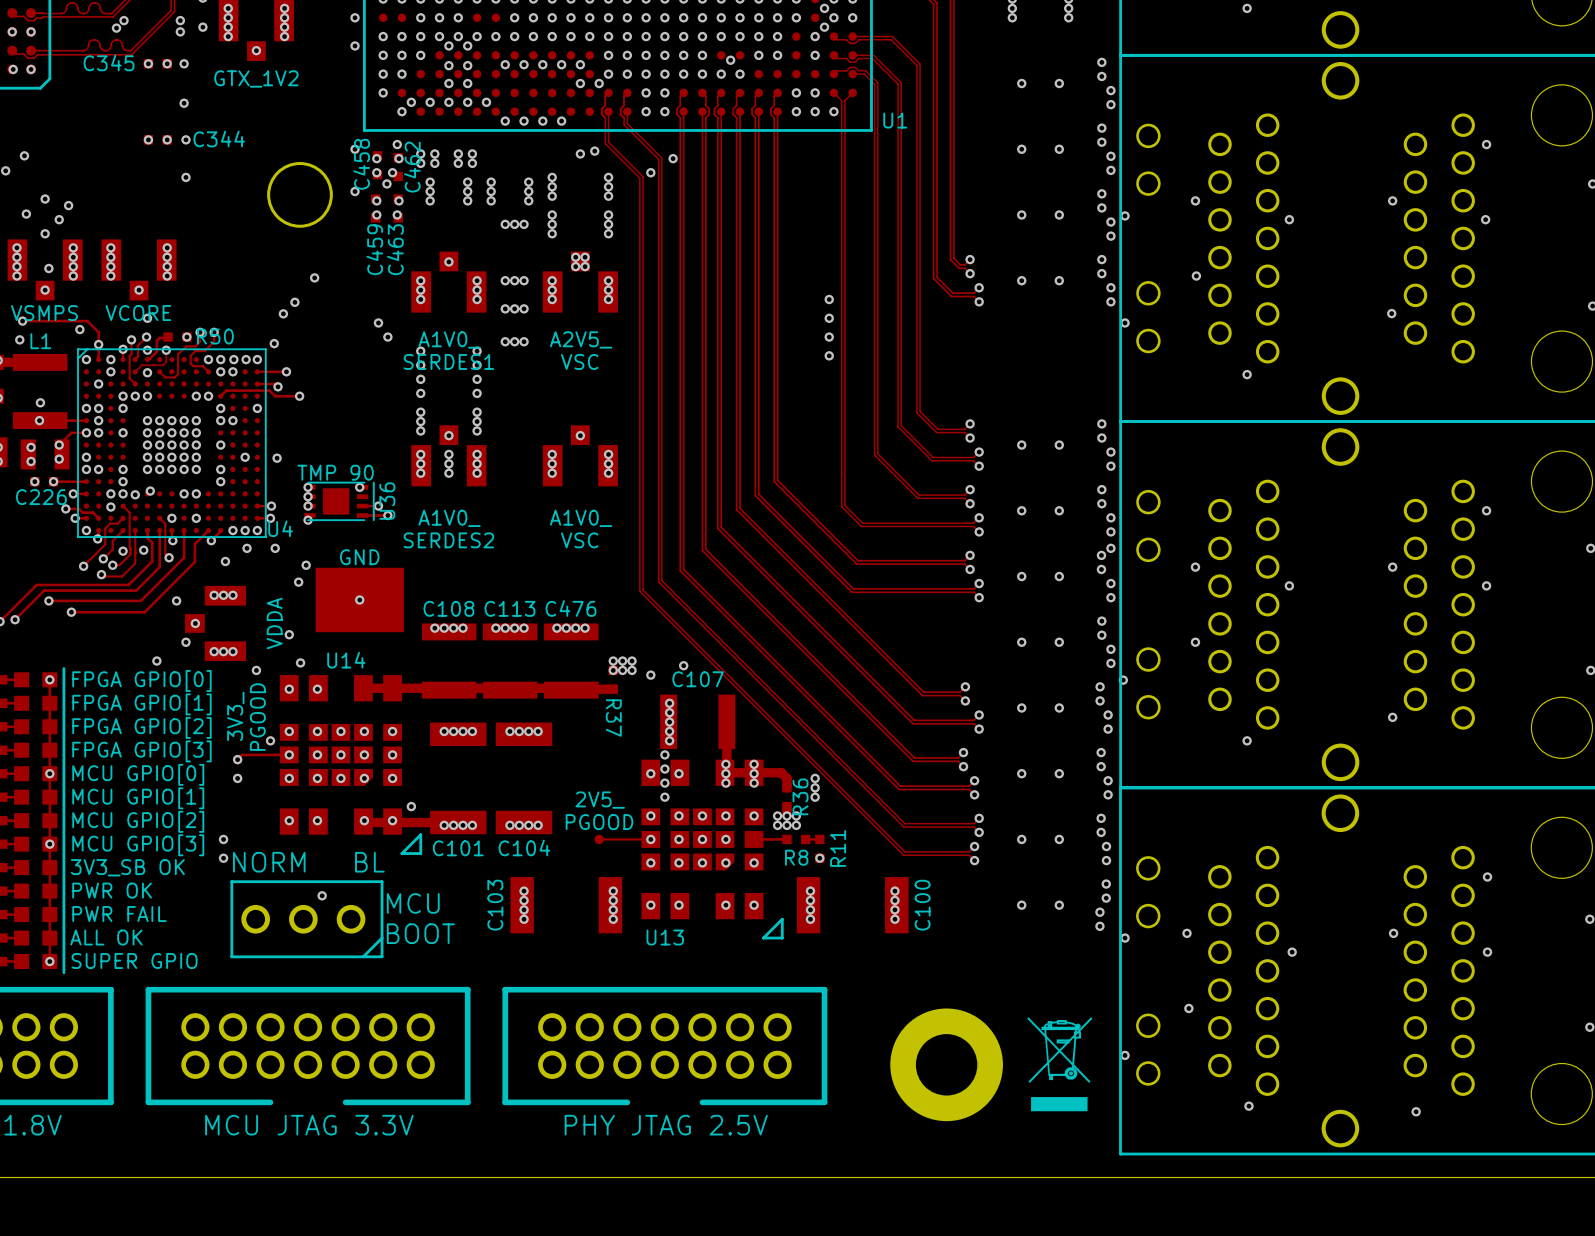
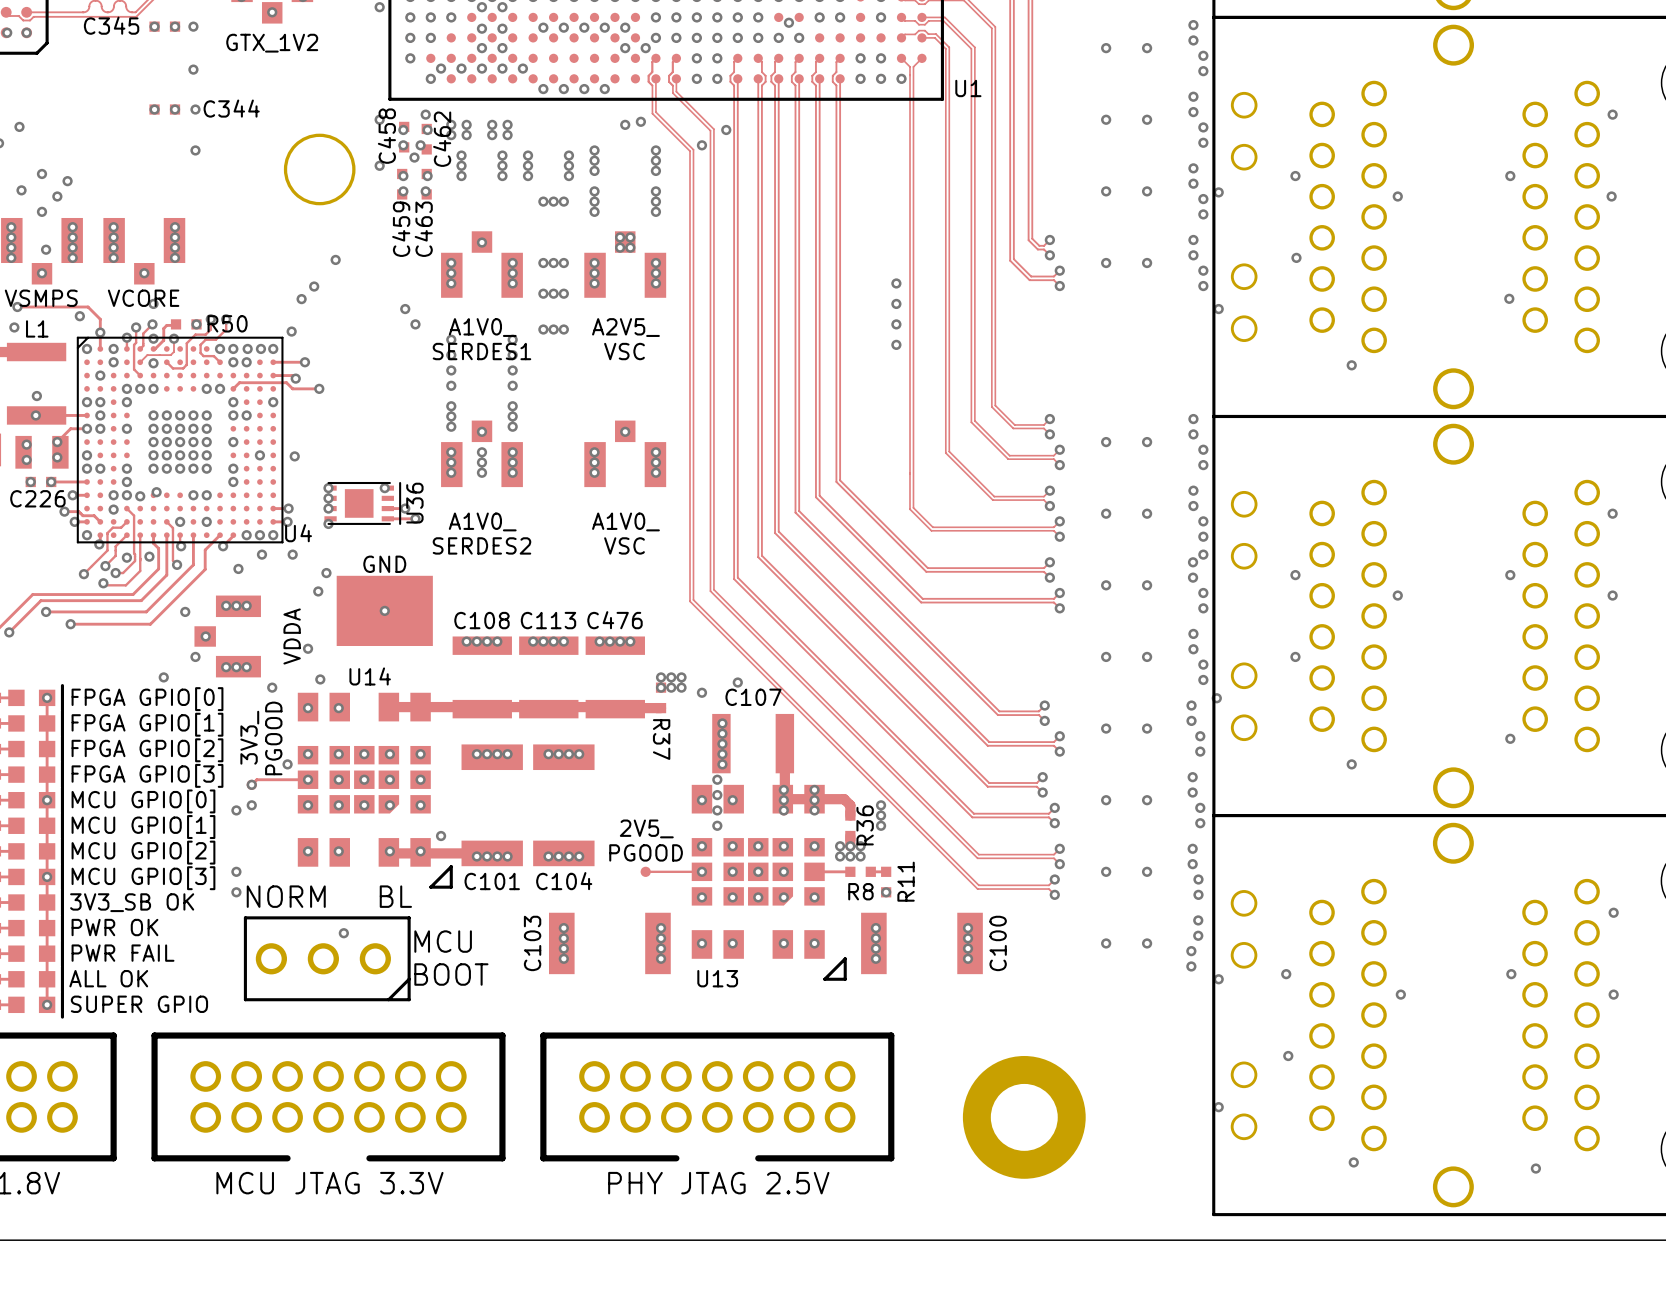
text: TMP 90 (335, 472) -> none
via: none -> (236, 810)
drawing: [1027, 1017, 1093, 1112] -> none

